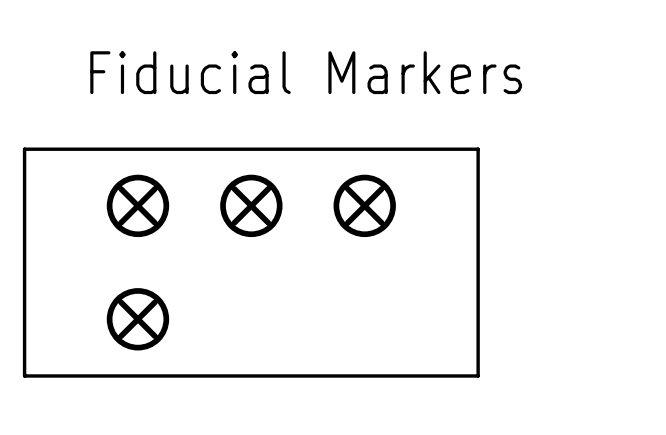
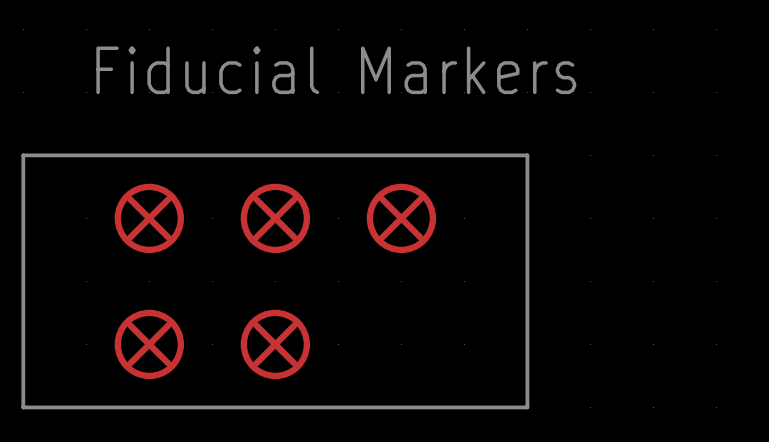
part: none -> (275, 344)

